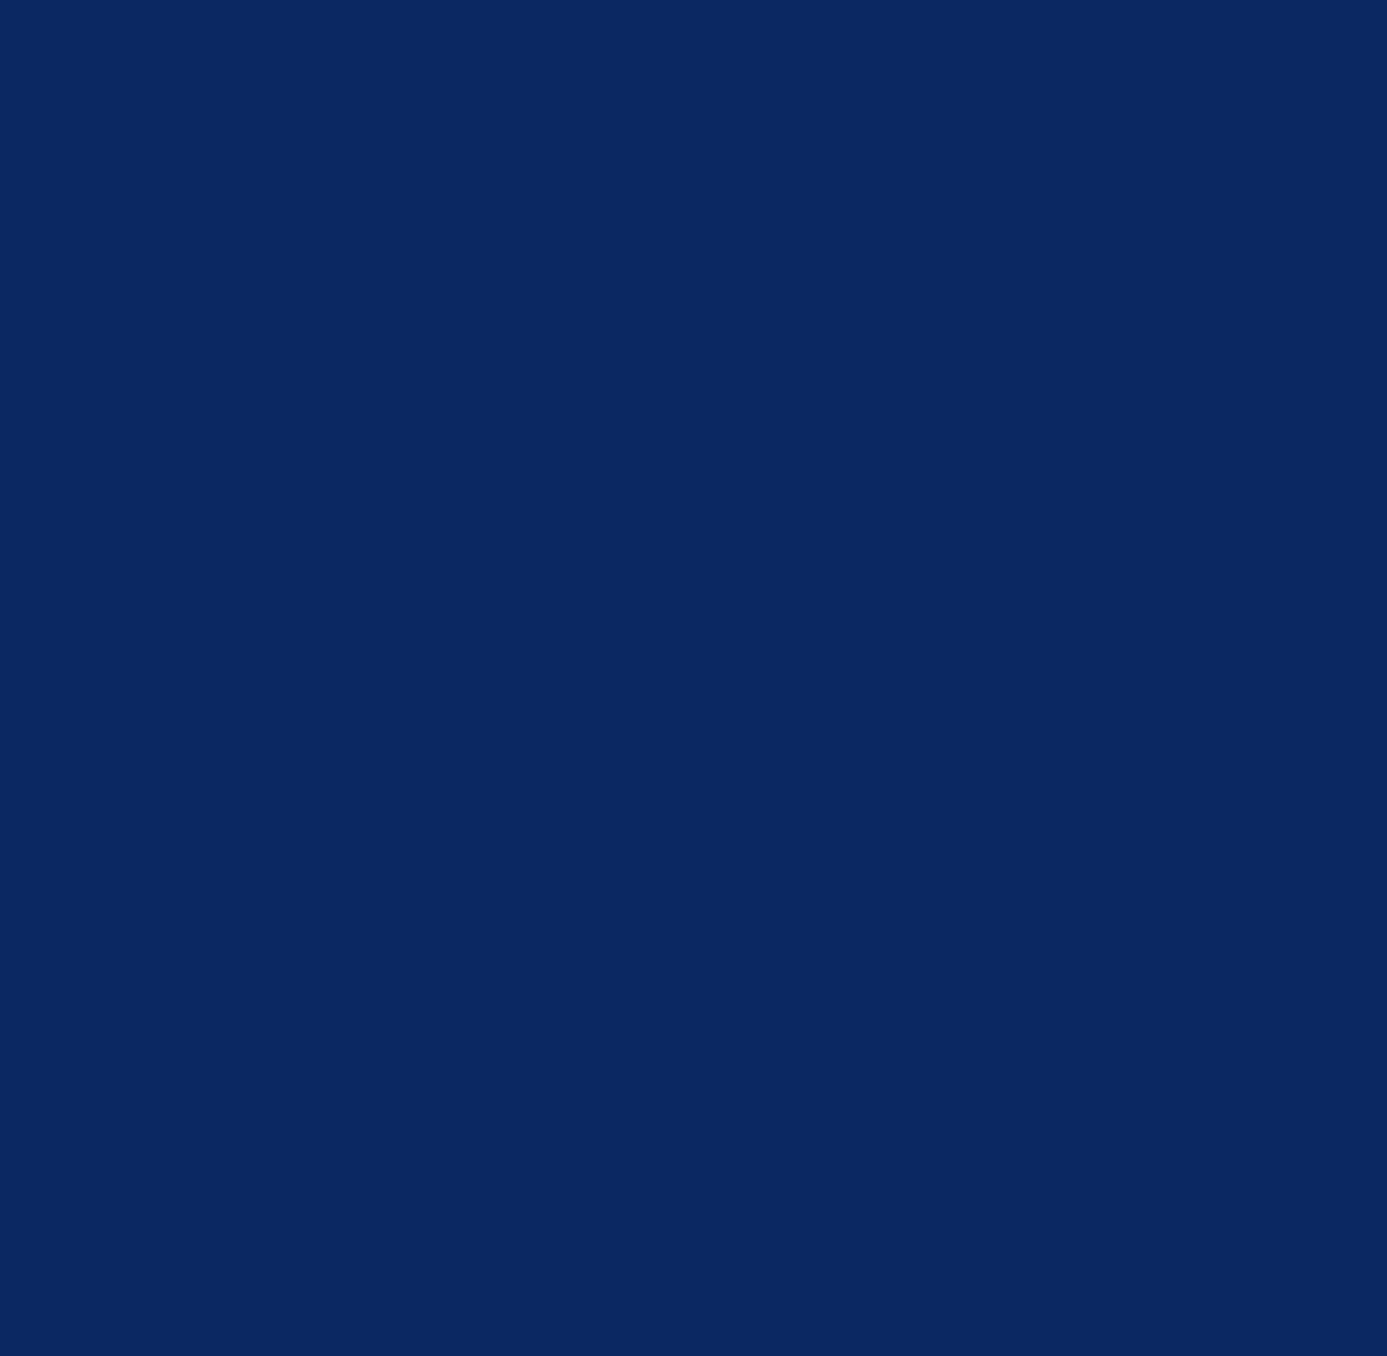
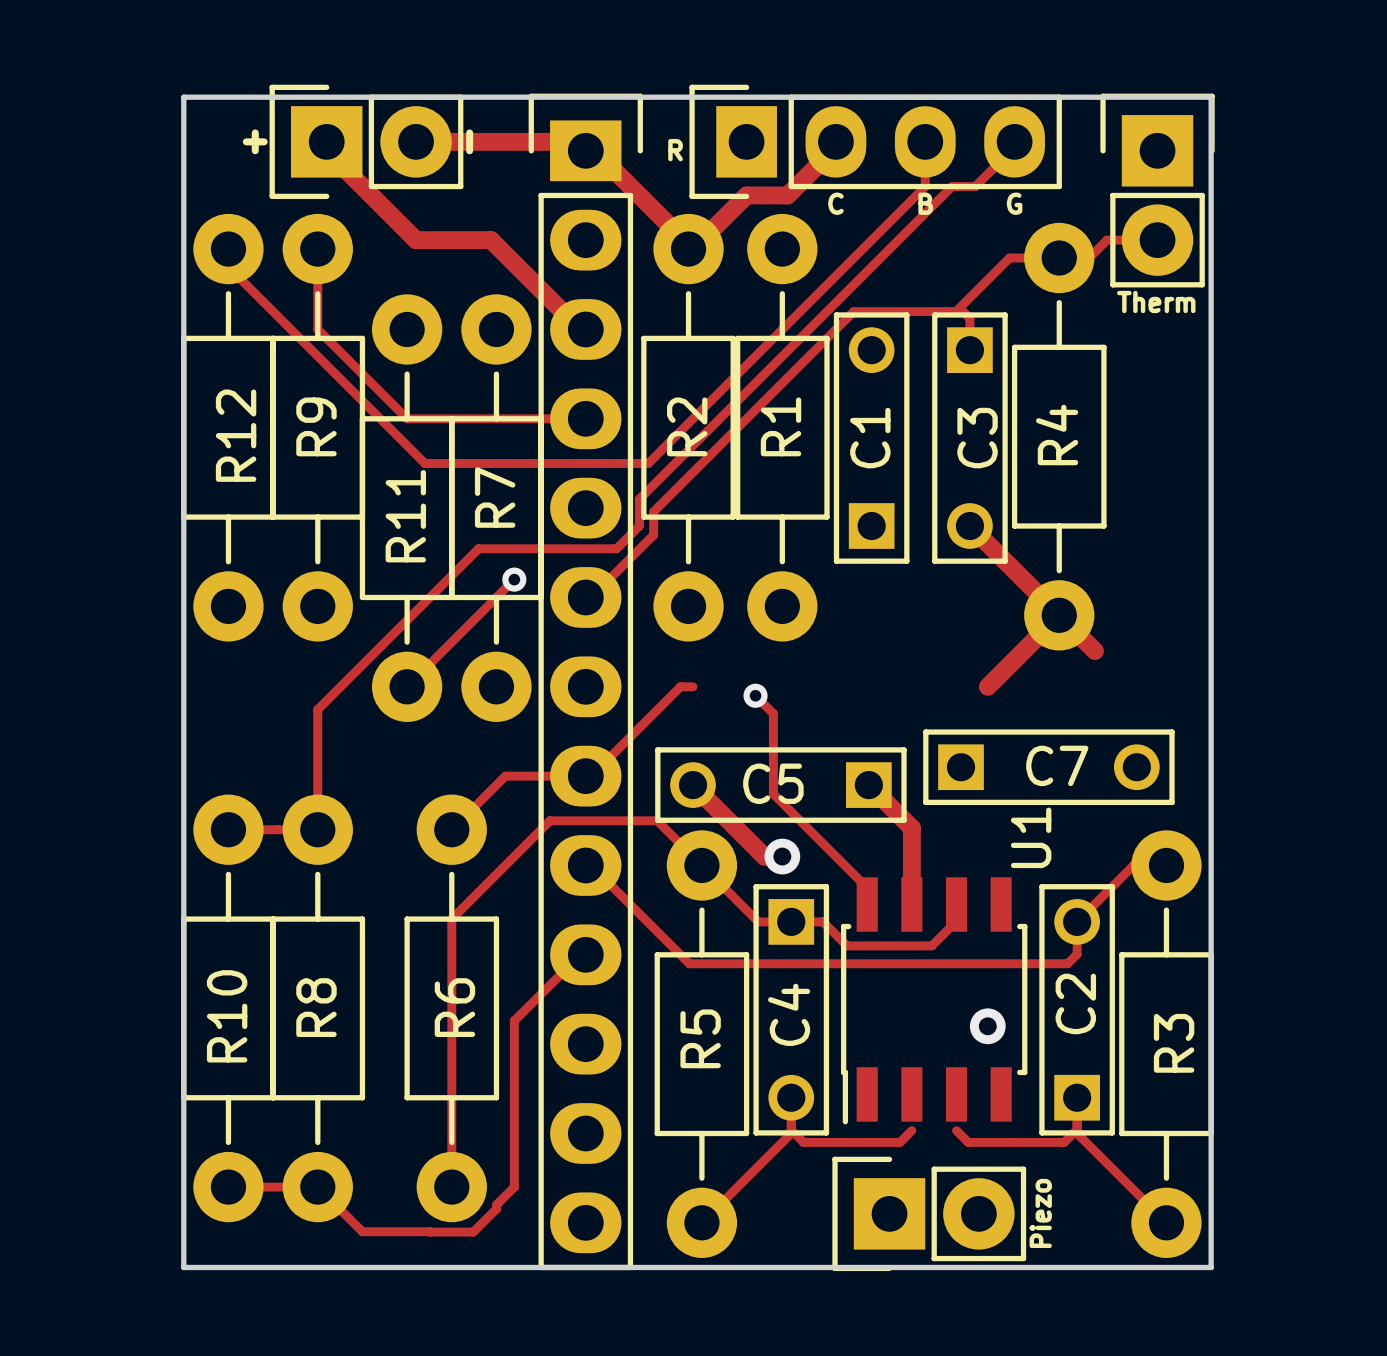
board edge: none -> (183, 97) (1211, 97) (1211, 1267) (183, 1267) (183, 97)
line: none -> (255, 132) (255, 150)
line: none -> (469, 132) (469, 150)
line: none -> (246, 141) (264, 141)
track: none -> (326, 141) (326, 150) (416, 240) (491, 240) (580, 329) (585, 329)
part: none -> (366, 141)
track: none -> (416, 141) (576, 141) (585, 150) (594, 150) (692, 249) (746, 195) (787, 195) (835, 147) (835, 141)
part: none -> (875, 141)
track: none -> (925, 141) (925, 186) (648, 463) (424, 463) (228, 266)
track: none -> (1014, 141) (1014, 147) (975, 186) (952, 186) (639, 499) (639, 526) (616, 548) (478, 548) (317, 709) (317, 829) (228, 829)
text: none -> R (675, 150)
part: none -> (1157, 190)
text: none -> C (835, 203)
text: none -> B (925, 203)
text: none -> G (1014, 203)
track: none -> (1157, 240) (1107, 240) (1089, 258) (1009, 258) (955, 311)
track: none -> (317, 266) (317, 329) (407, 418) (585, 418)
text: none -> Therm (1156, 302)
track: none -> (969, 350) (969, 318) (963, 311) (853, 311) (653, 511) (653, 534) (591, 597) (585, 597)
R12: none -> (228, 427)
R9: none -> (317, 427)
R2: none -> (688, 427)
R1: none -> (782, 427)
R4: none -> (1059, 436)
C1: none -> (871, 438)
C3: none -> (969, 438)
R11: none -> (407, 508)
R7: none -> (496, 508)
track: none -> (969, 526) (1095, 651)
track: none -> (514, 579) (407, 686)
via: none -> (514, 579)
track: none -> (1059, 615) (987, 686)
part: none -> (585, 681)
track: none -> (692, 686) (680, 686) (591, 776) (505, 776) (451, 829)
track: none -> (755, 695) (773, 713) (773, 794) (867, 887) (867, 904)
via: none -> (755, 695)
C7: none -> (1048, 767)
track: none -> (692, 785) (764, 856) (782, 856)
C5: none -> (780, 785)
track: none -> (868, 785) (911, 828) (911, 904)
via: none -> (782, 856)
track: none -> (585, 865) (591, 865) (689, 963) (1067, 963) (1077, 954) (1077, 921) (1133, 865) (1166, 865)
track: none -> (956, 904) (956, 921) (931, 945) (847, 945) (823, 921) (758, 921) (657, 820) (550, 820) (451, 919) (451, 1187)
track: none -> (576, 963) (585, 954) (580, 954) (514, 1020) (514, 1187) (496, 1204) (496, 1208) (473, 1232) (430, 1232)
U1: none -> (934, 1000)
R10: none -> (228, 1008)
R8: none -> (317, 1008)
R6: none -> (451, 1008)
C4: none -> (791, 1009)
C2: none -> (1077, 1009)
via: none -> (987, 1026)
R5: none -> (701, 1044)
R3: none -> (1166, 1044)
track: none -> (791, 1097) (791, 1133) (701, 1222)
track: none -> (1077, 1097) (1077, 1133) (1166, 1222)
track: none -> (1077, 1129) (1064, 1142) (968, 1142) (956, 1130)
track: none -> (791, 1130) (803, 1142) (900, 1142) (911, 1130)
track: none -> (228, 1187) (317, 1187) (362, 1231) (429, 1231)
part: none -> (929, 1213)
text: none -> Piezo (1040, 1213)

